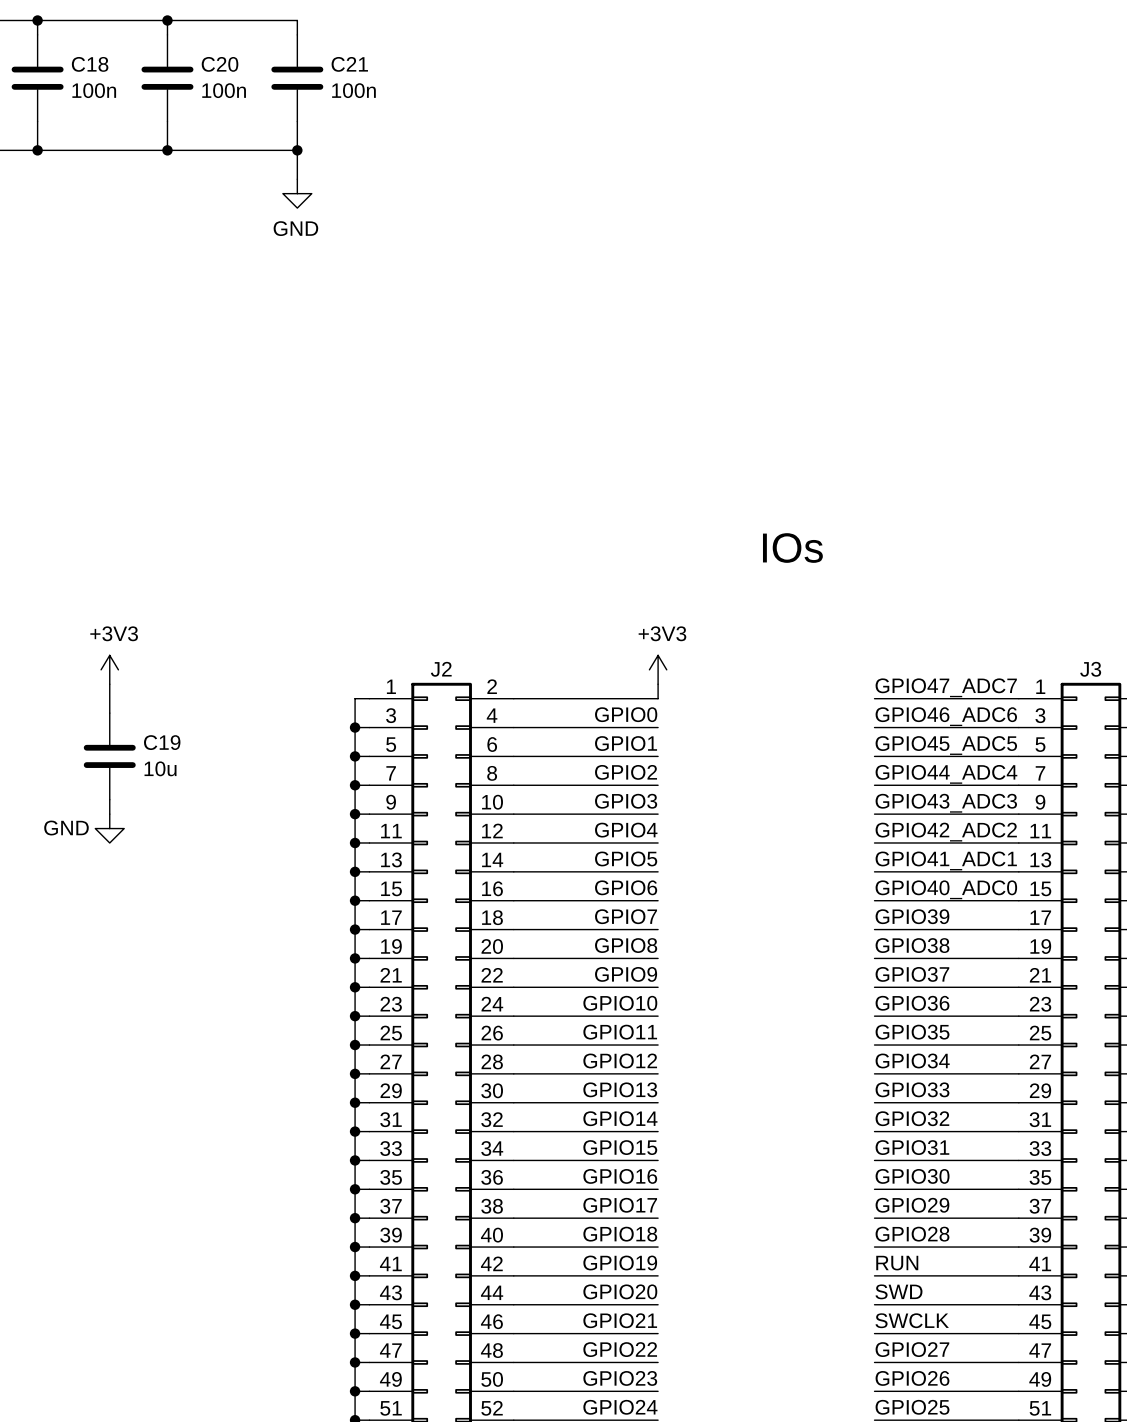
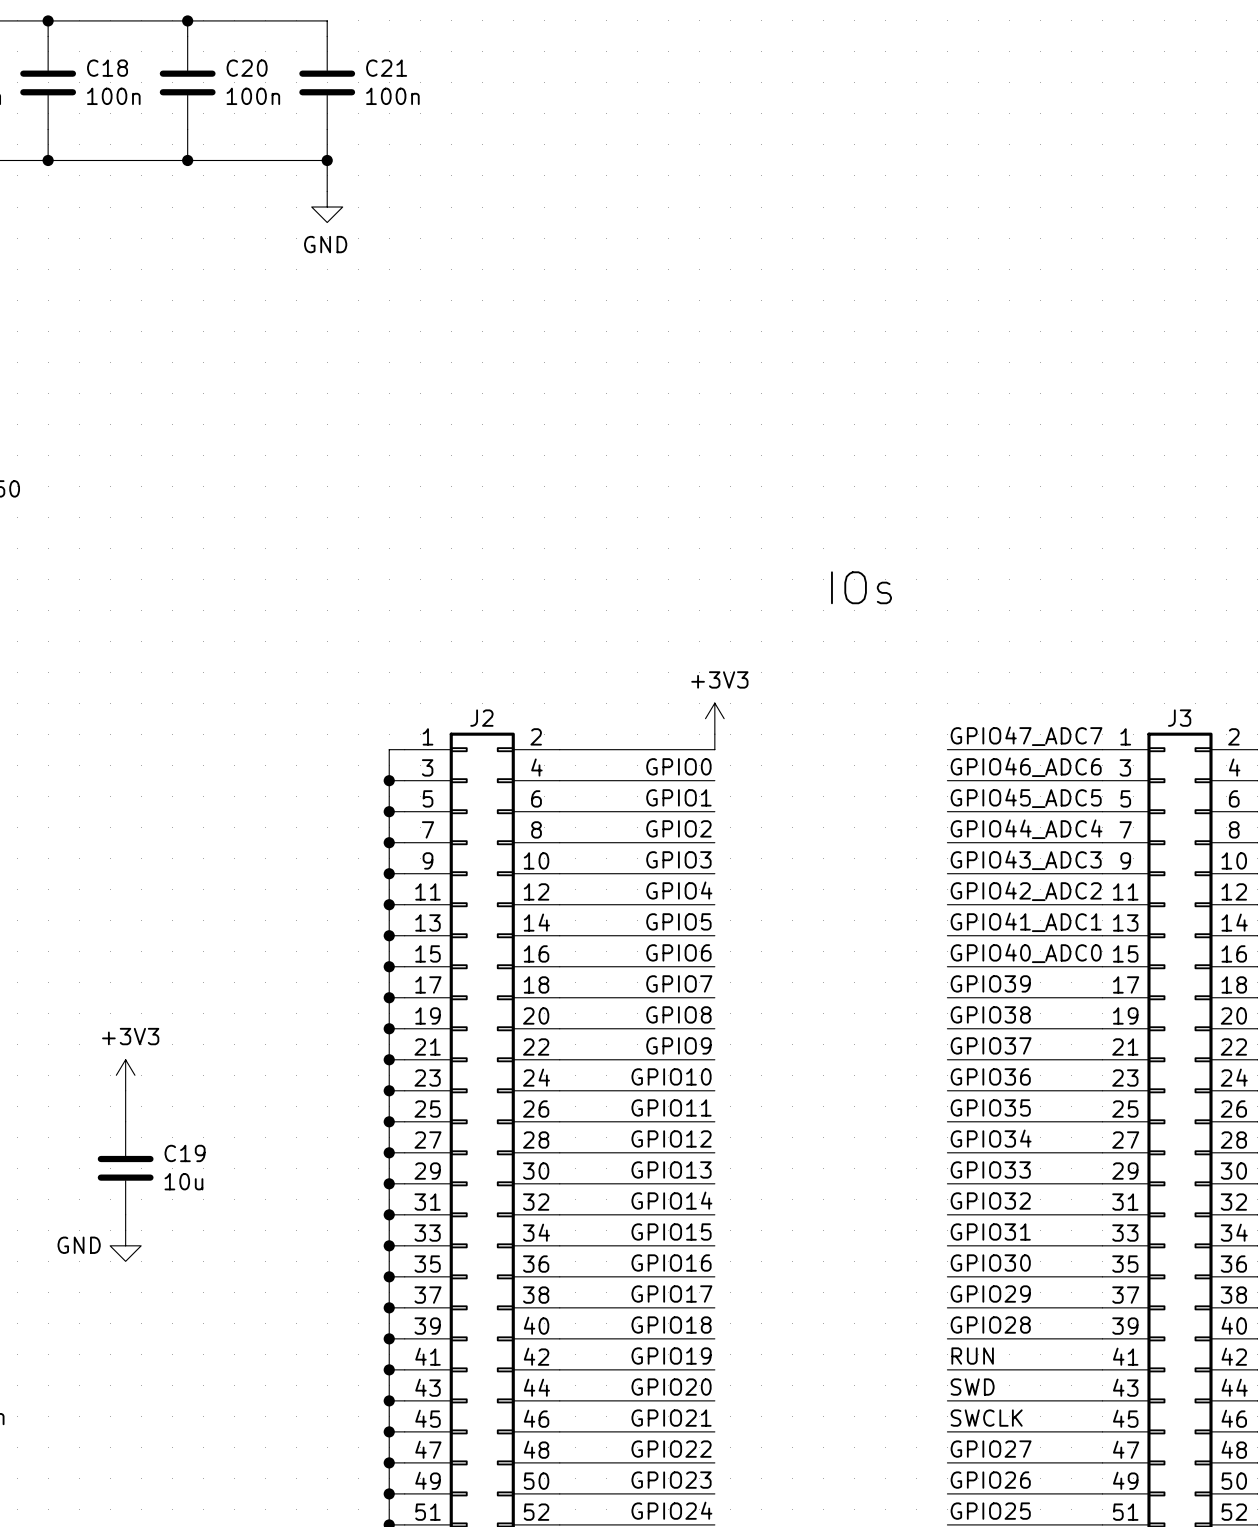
power symbol: +3V3 (109, 669) -> none
wire: (109, 684) (109, 713) -> none
C19 position: (109, 756) -> (125, 1168)
wire: (109, 799) (109, 814) -> none
power symbol: GND (109, 828) -> none
power symbol: none -> +3V3 (125, 1075)
wire: none -> (125, 1090) (125, 1121)
wire: none -> (125, 1214) (125, 1230)
power symbol: none -> GND (125, 1245)

